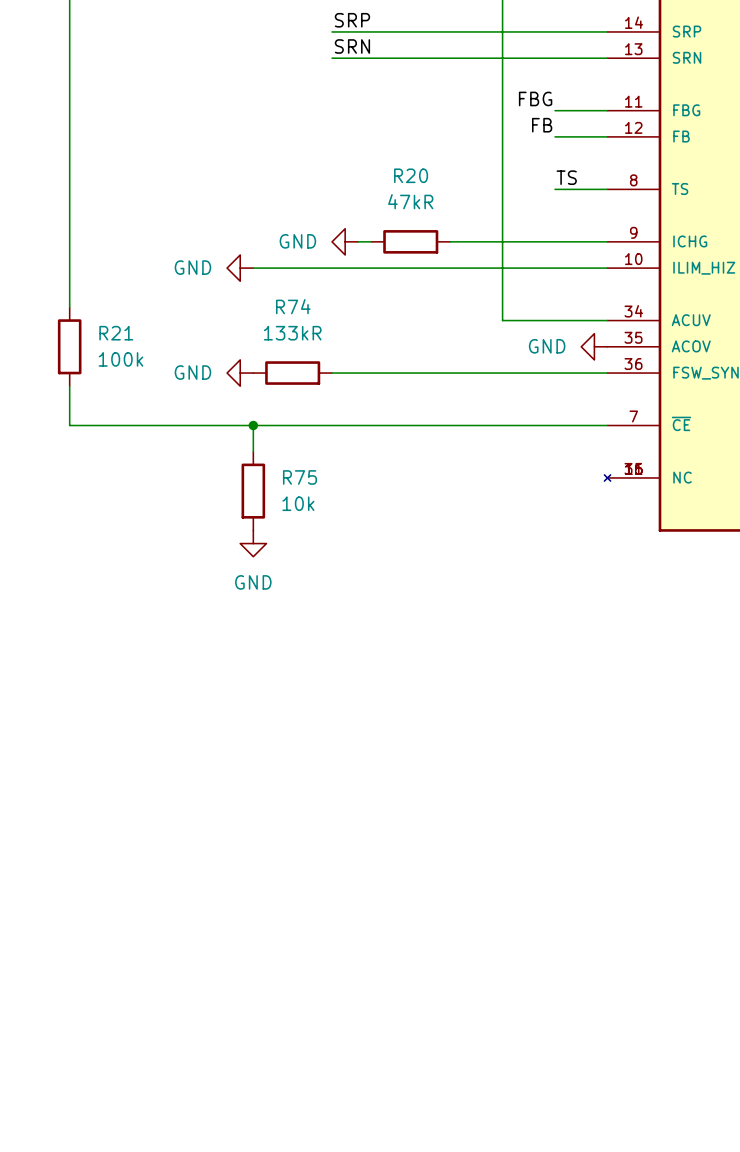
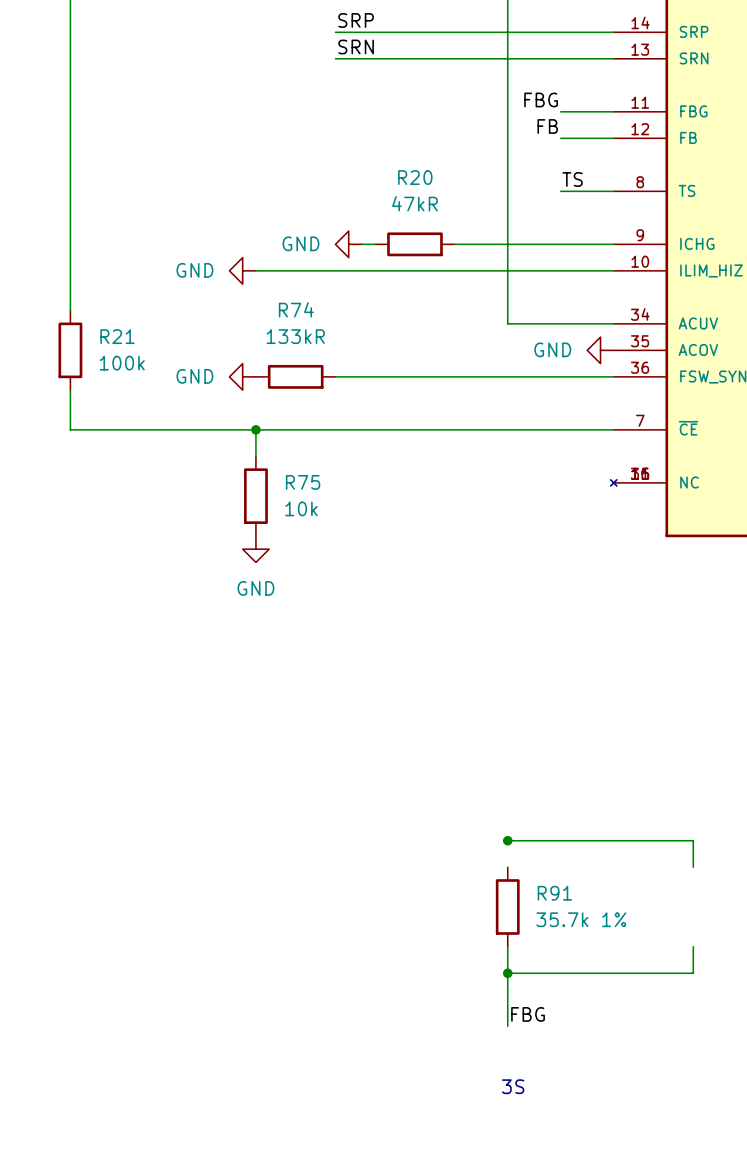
wire: none -> (507, 840) (693, 840) (693, 867)
junction: none -> (507, 840)
R91: none -> 35.7k 1% (507, 906)
wire: none -> (507, 946) (507, 1026)
wire: none -> (693, 946) (693, 973) (507, 973)
junction: none -> (507, 973)
label: none -> FBG (528, 1014)
text: none -> 3S (513, 1086)

